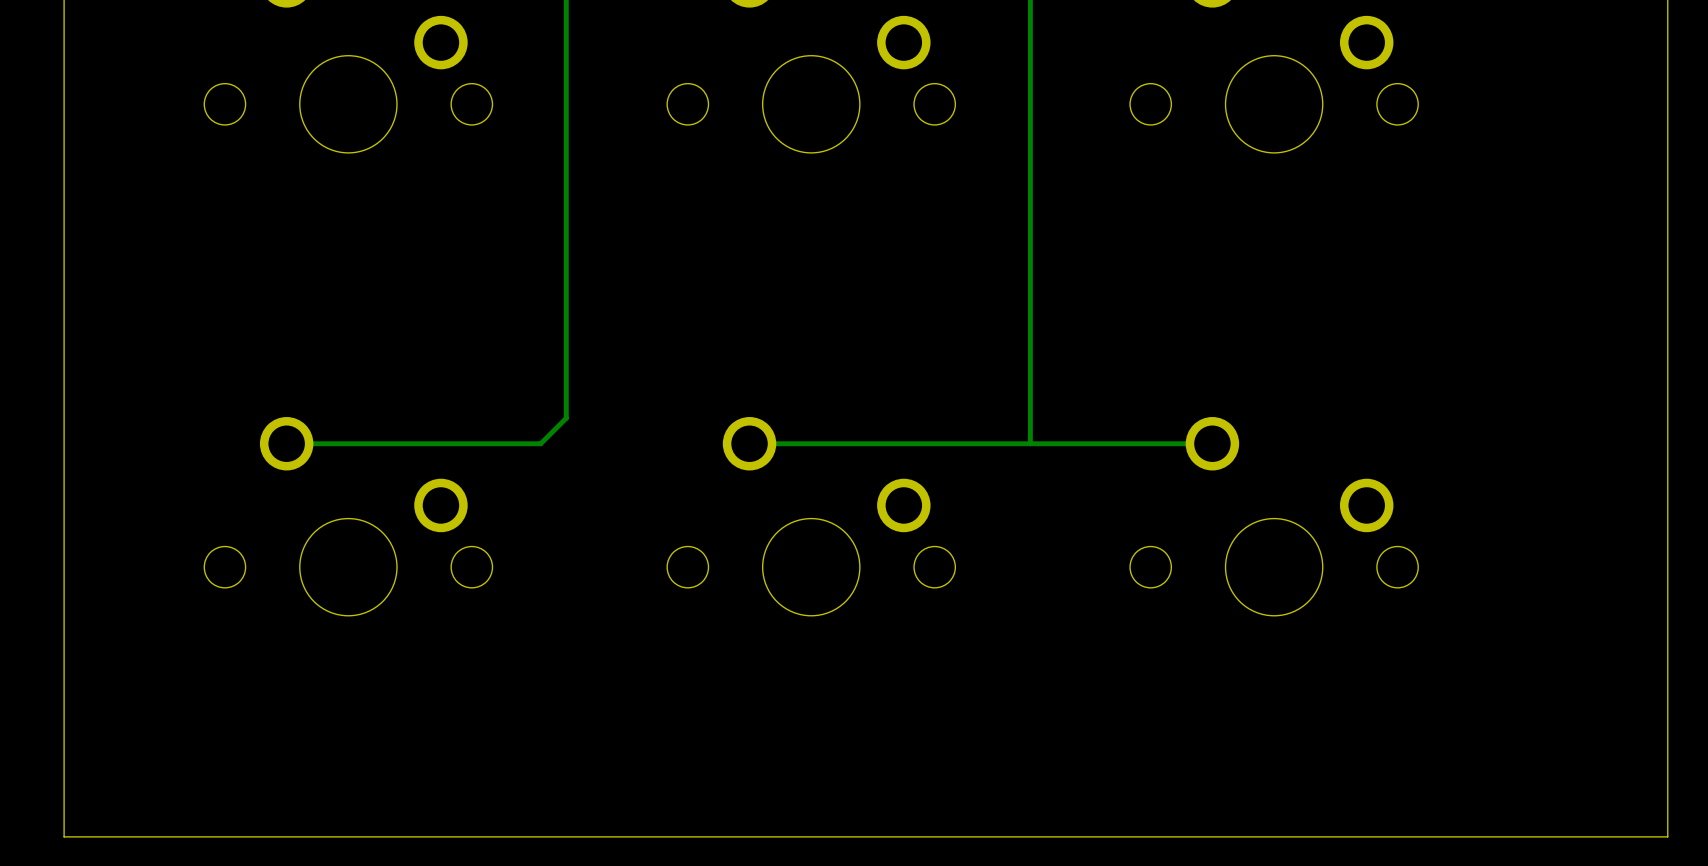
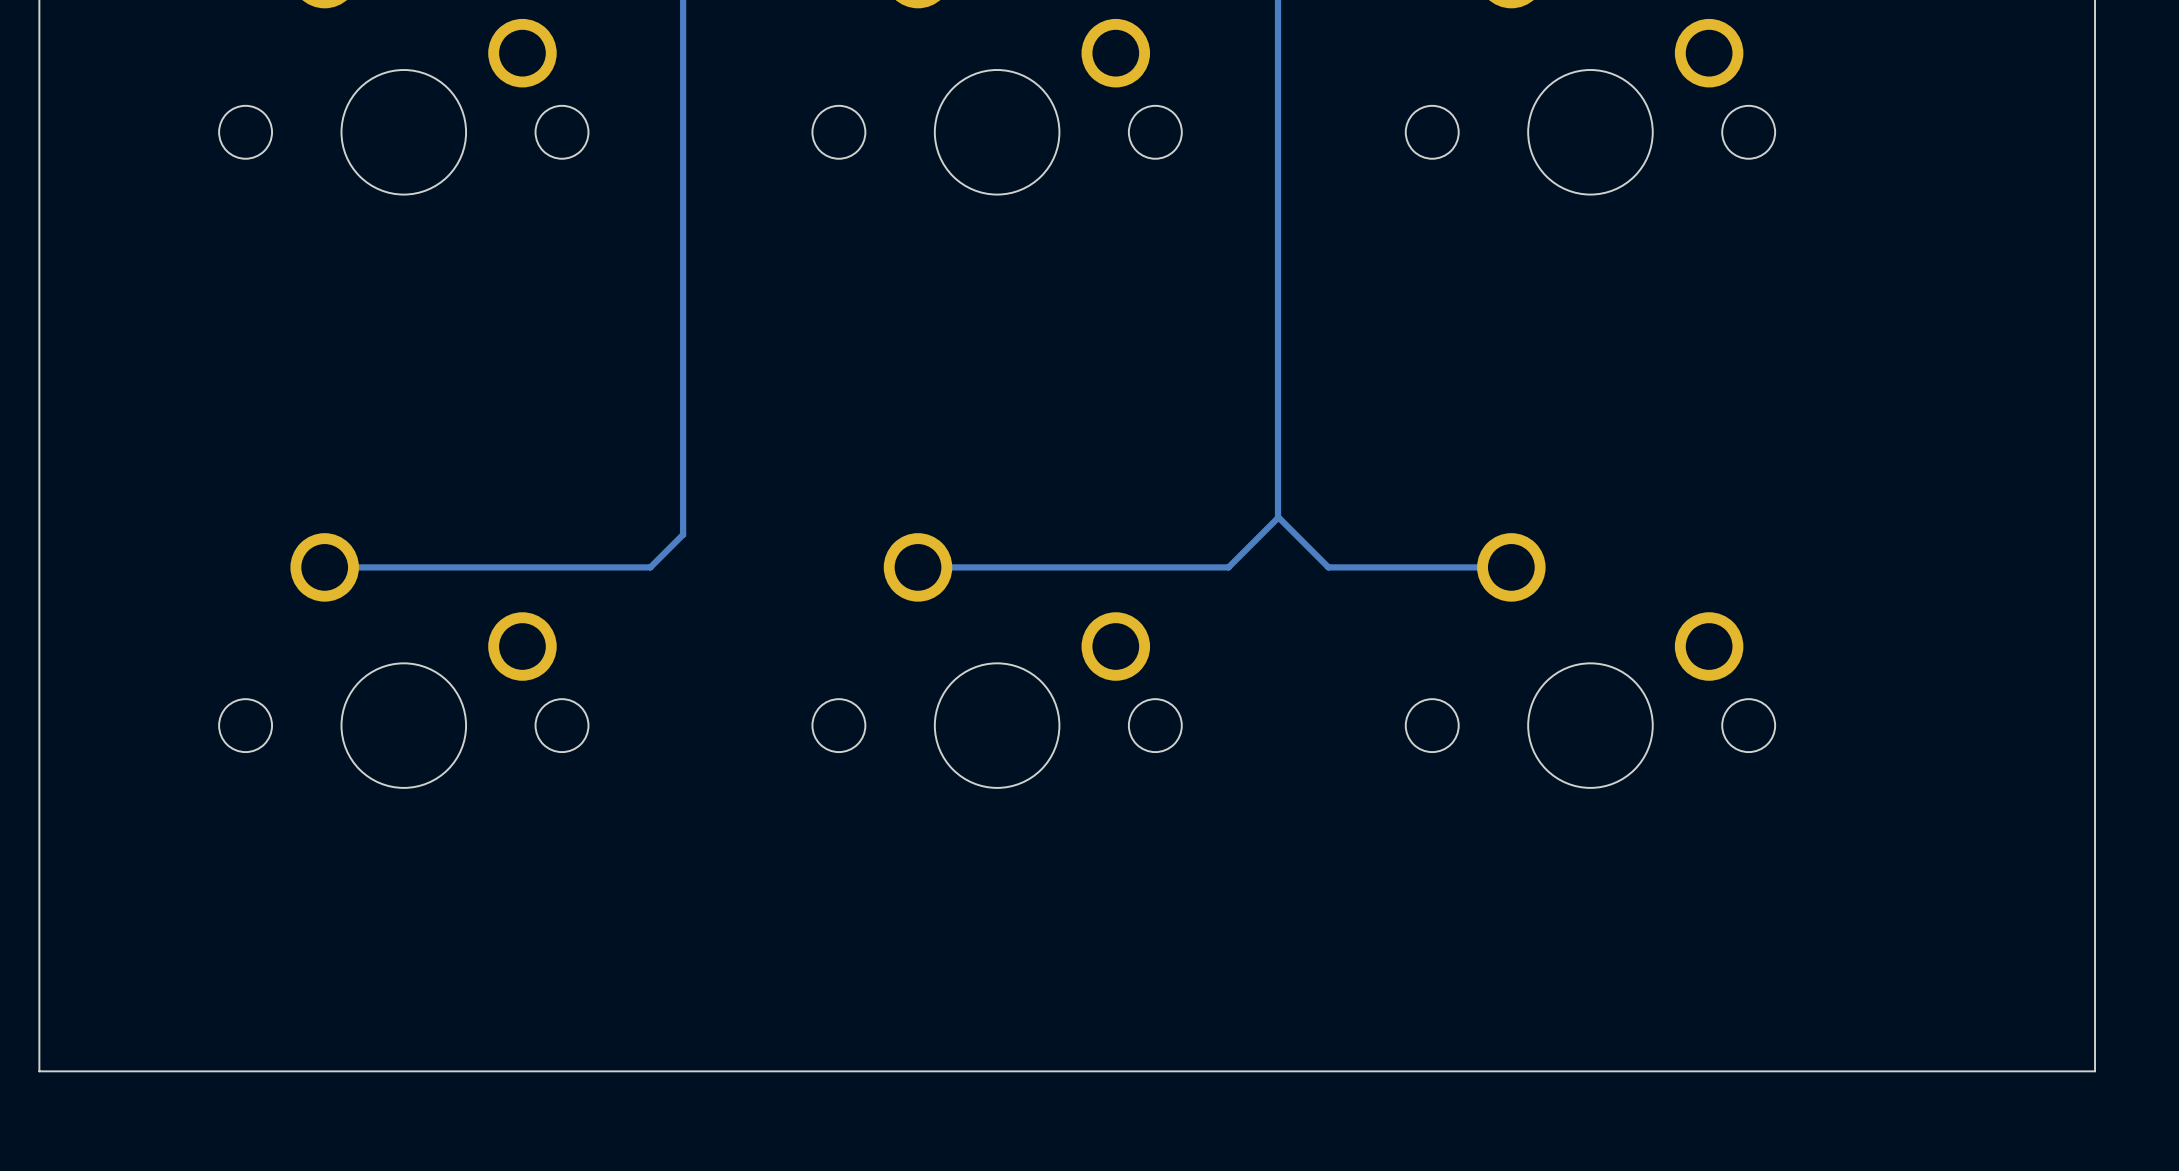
track: (1030, 405) (1030, 443) -> (1278, 517) (1228, 567)
track: (1069, 443) (991, 443) -> (1328, 567) (1278, 516)

